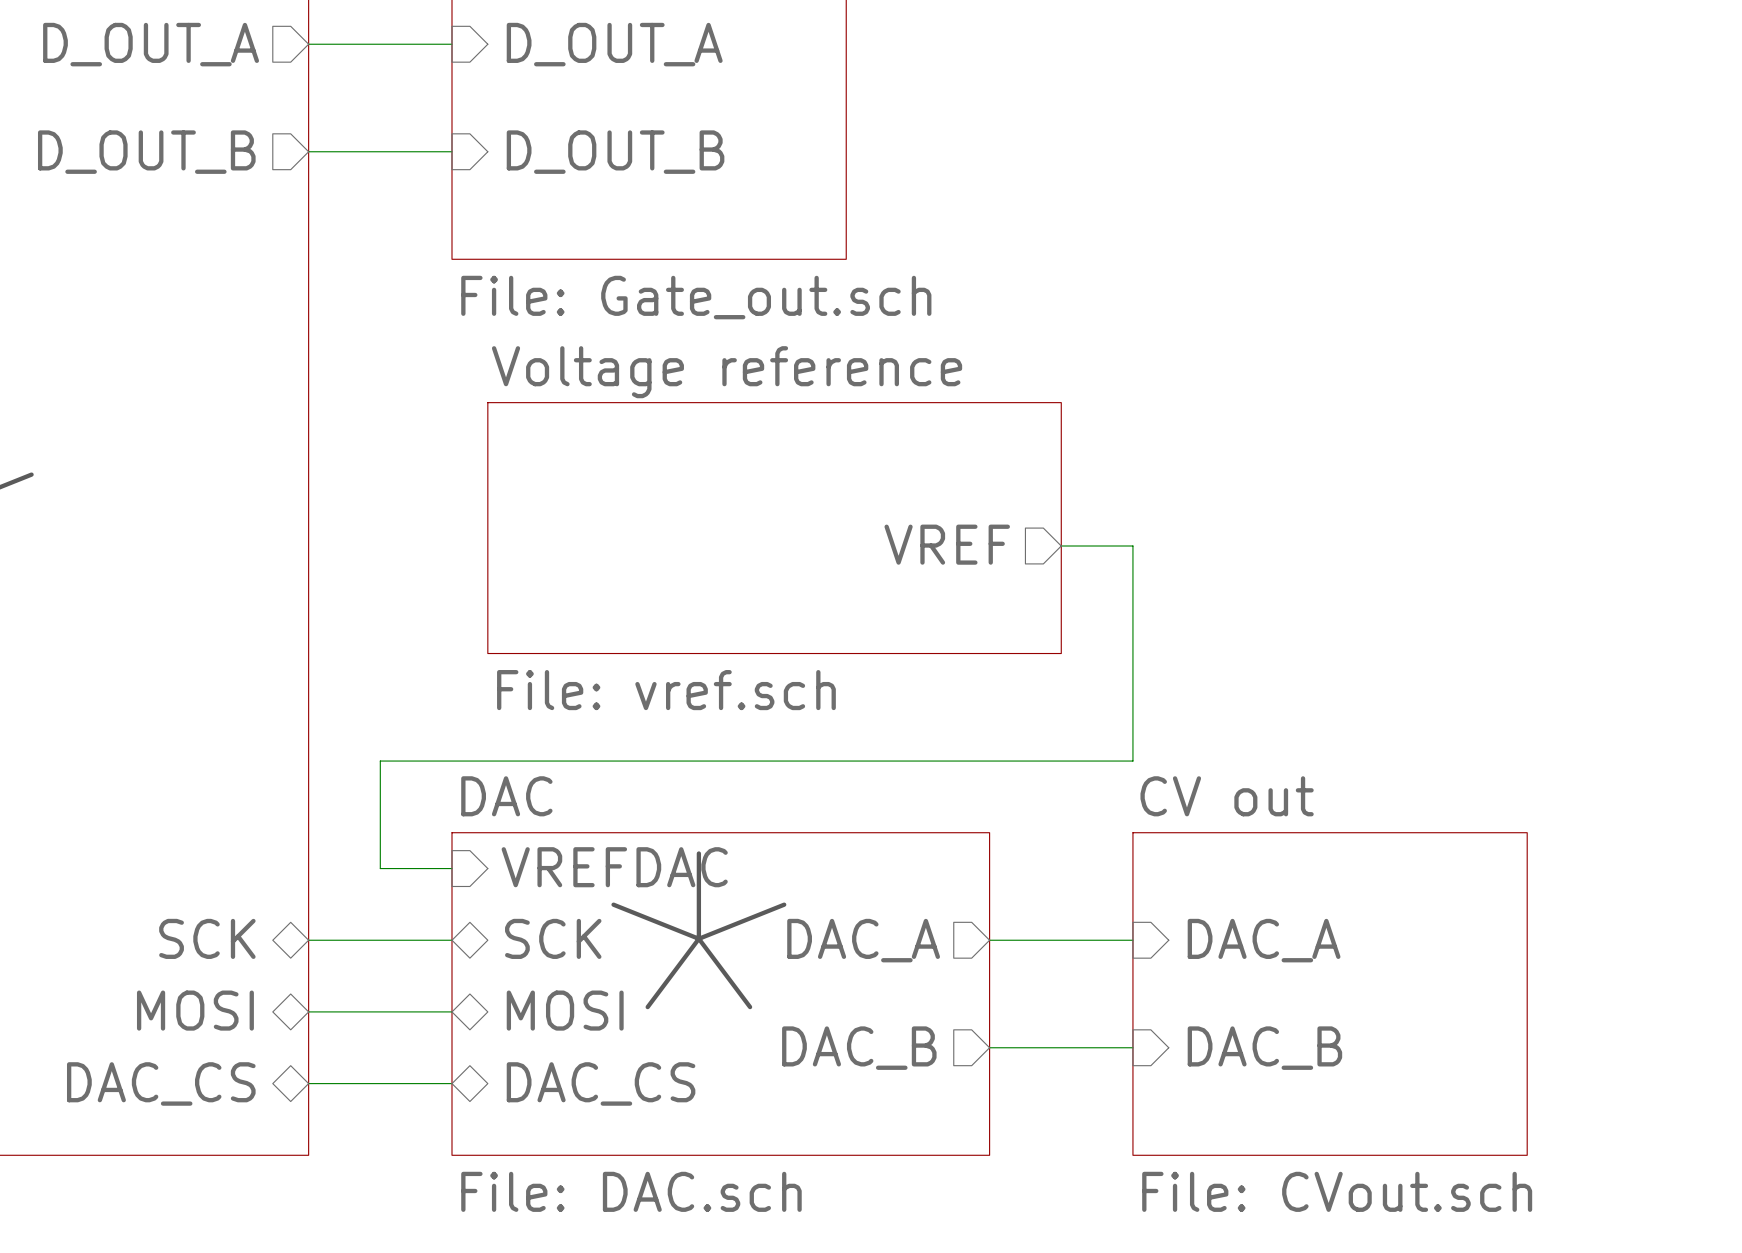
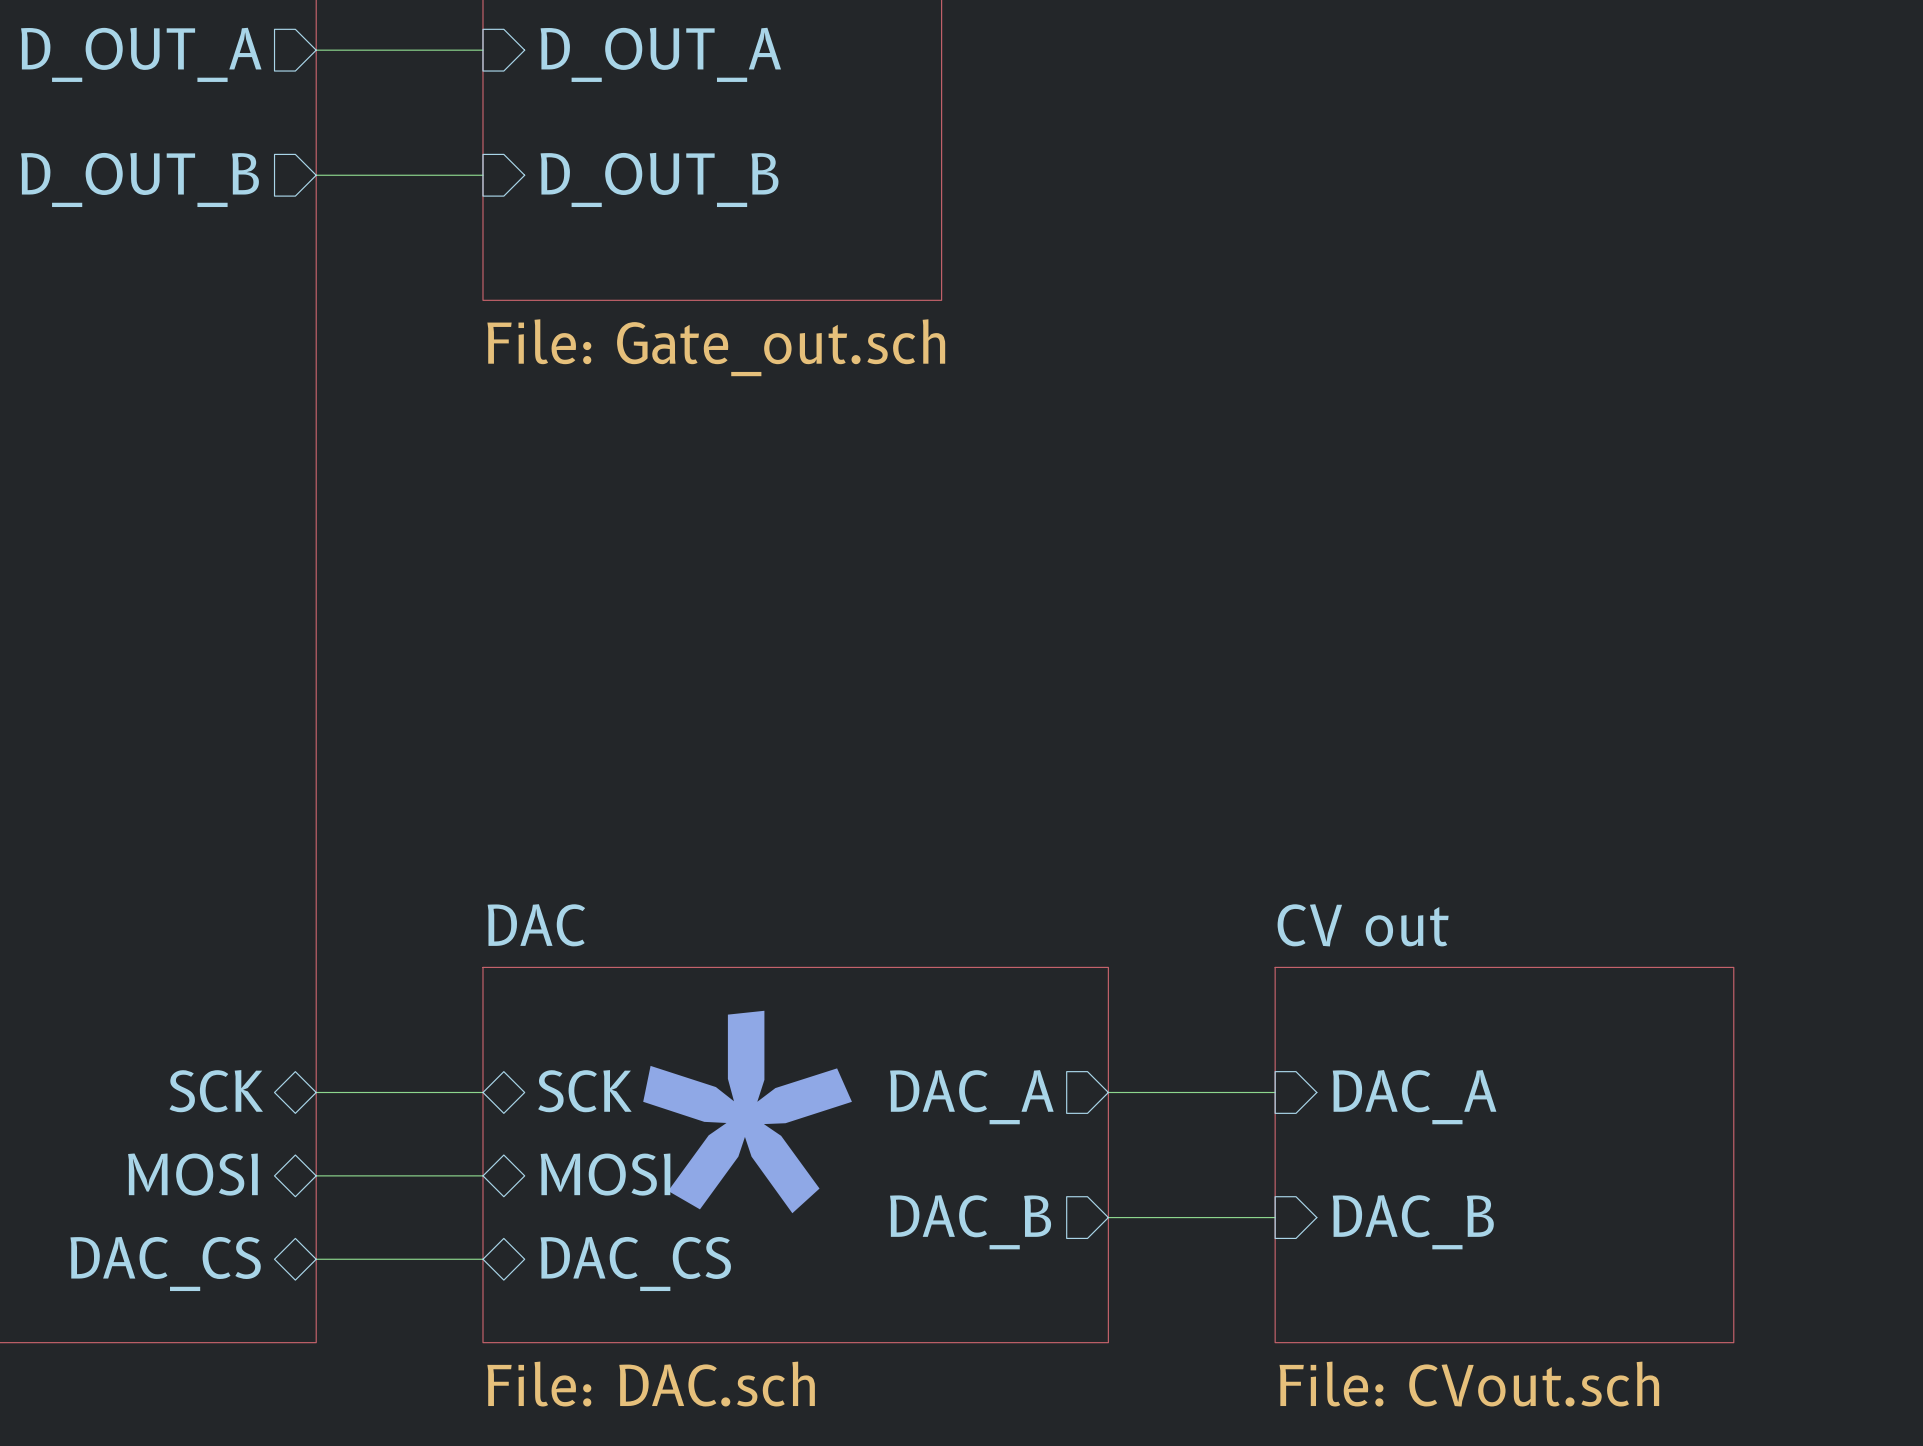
sheet Voltage reference: File: vref.sch (774, 528) -> none
sheet pin: VREF (947, 544) -> none
wire: (1061, 546) (1132, 546) (1132, 761) (380, 761) (380, 868) (451, 868) -> none
sheet pin: VREFDAC (614, 867) -> none

